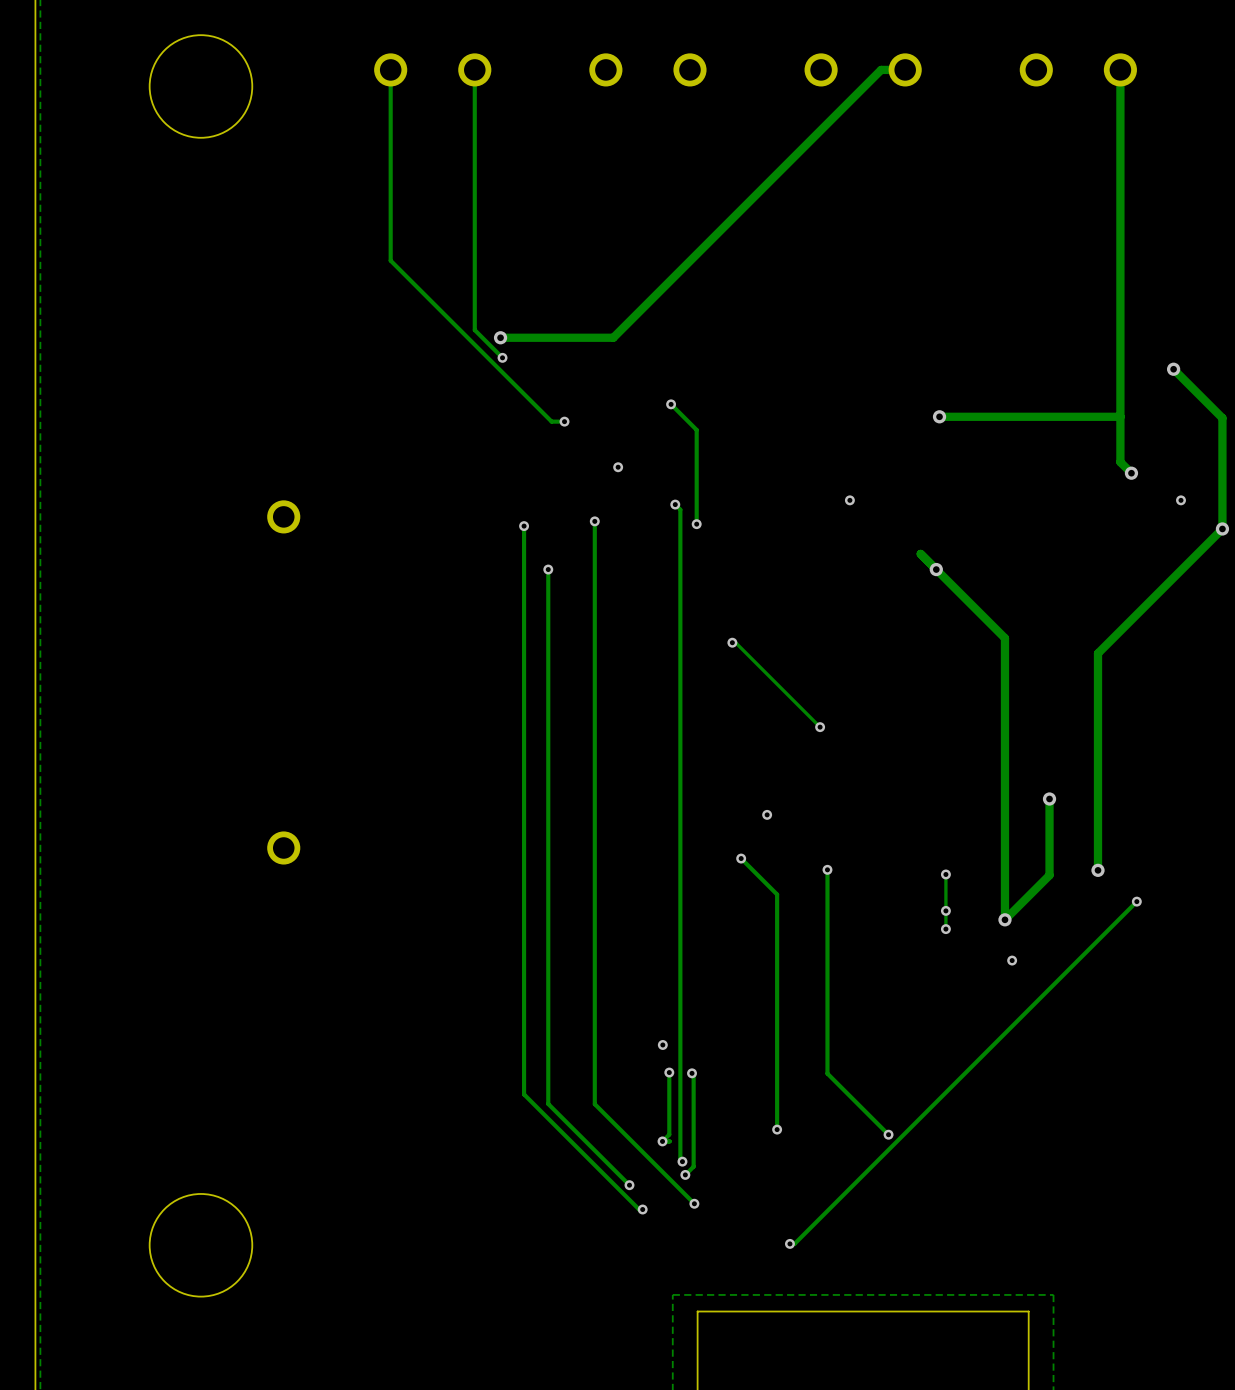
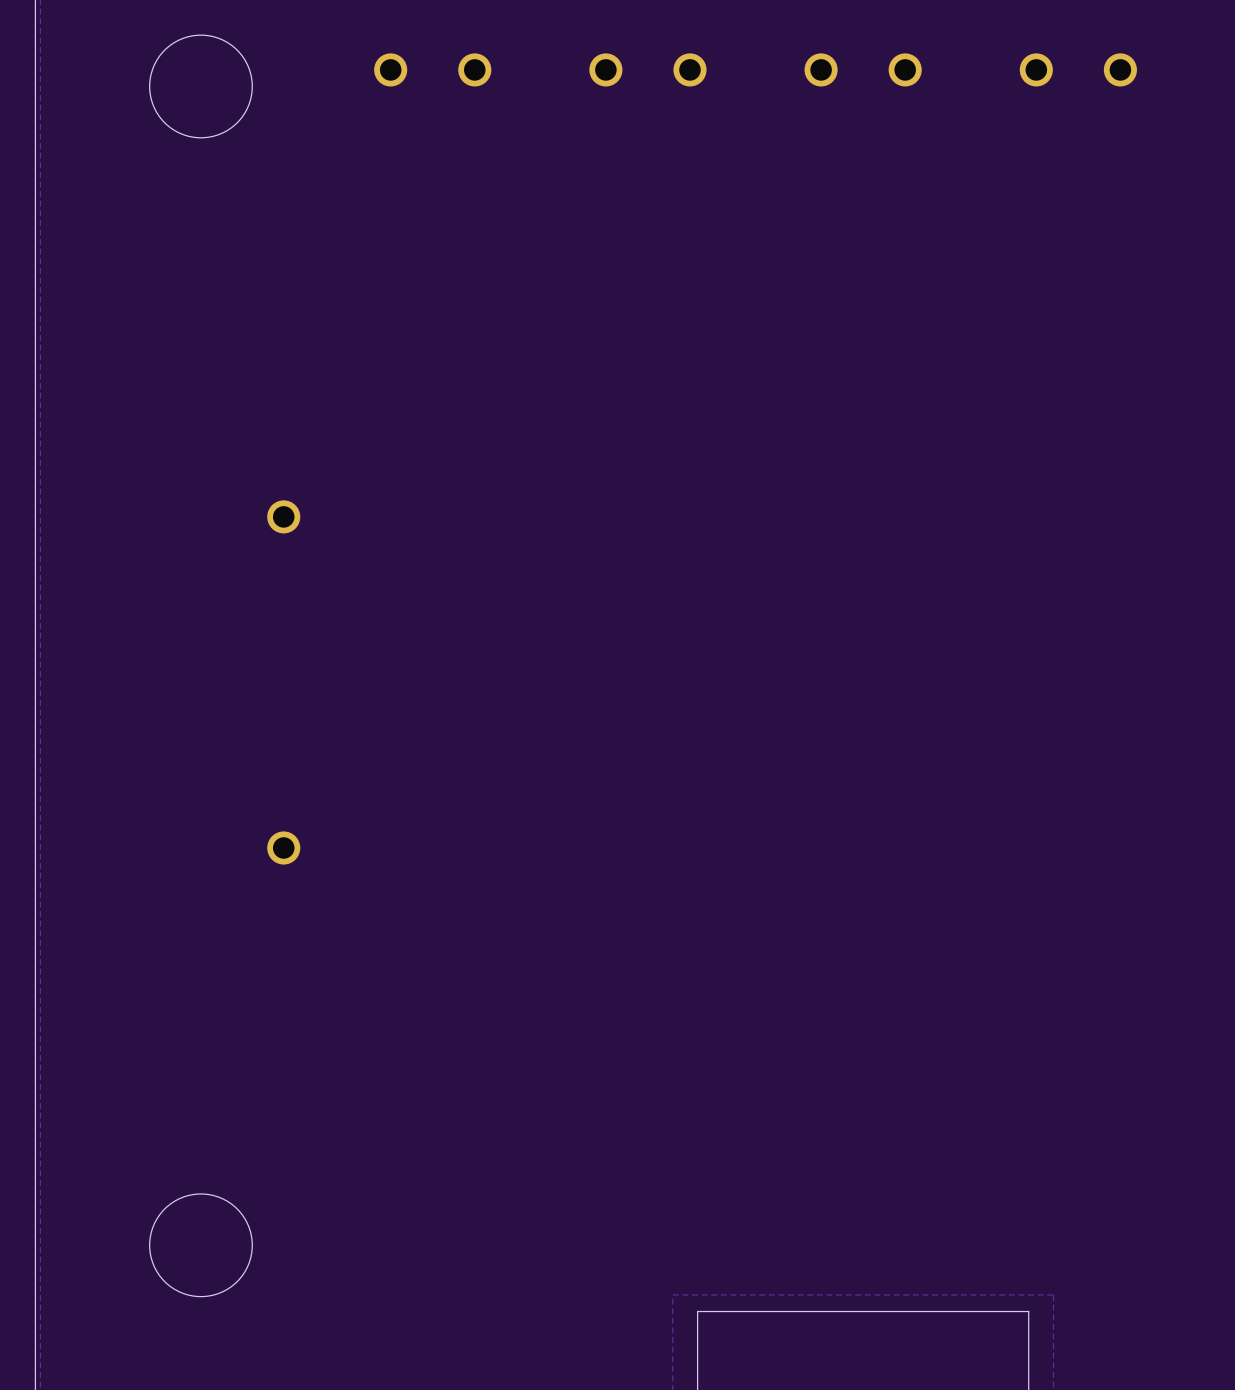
track: (390, 69) (390, 260) (551, 421) (564, 421) -> none
track: (474, 69) (474, 330) (502, 357) -> none
track: (905, 69) (881, 69) (613, 337) (500, 337) -> none
track: (1120, 69) (1120, 462) (1131, 473) -> none
via: (500, 337) -> none
via: (502, 357) -> none
track: (1173, 369) (1222, 418) (1222, 528) (1098, 653) (1098, 870) -> none
via: (1173, 369) -> none
track: (671, 404) (696, 429) (696, 524) -> none
via: (671, 404) -> none
via: (939, 416) -> none
track: (1120, 416) (939, 416) -> none
via: (564, 421) -> none
via: (618, 467) -> none
via: (1131, 473) -> none
via: (849, 500) -> none
via: (1180, 500) -> none
track: (675, 504) (680, 509) (680, 1159) (683, 1161) -> none
via: (675, 504) -> none
track: (594, 521) (594, 1104) (694, 1203) -> none
via: (594, 521) -> none
via: (696, 524) -> none
track: (524, 526) (524, 1094) (639, 1209) (642, 1209) -> none
via: (524, 526) -> none
via: (1222, 528) -> none
track: (920, 553) (1004, 638) (1004, 919) (1049, 875) (1049, 798) -> none
track: (548, 569) (548, 1103) (629, 1185) -> none
via: (548, 569) -> none
via: (936, 569) -> none
track: (732, 642) (735, 642) (820, 727) -> none
via: (732, 642) -> none
via: (820, 727) -> none
via: (1049, 798) -> none
via: (767, 814) -> none
track: (741, 858) (777, 894) (777, 1129) -> none
via: (741, 858) -> none
track: (827, 869) (827, 1073) (888, 1134) -> none
via: (827, 869) -> none
via: (1098, 870) -> none
track: (945, 874) (945, 929) -> none
via: (945, 874) -> none
track: (1136, 901) (794, 1243) (789, 1243) -> none
via: (1136, 901) -> none
via: (945, 910) -> none
via: (1004, 919) -> none
via: (945, 929) -> none
via: (1012, 960) -> none
via: (662, 1044) -> none
track: (669, 1072) (669, 1134) (662, 1141) (669, 1141) -> none
via: (669, 1072) -> none
track: (692, 1073) (693, 1074) (693, 1166) (685, 1174) -> none
via: (692, 1073) -> none
via: (777, 1129) -> none
via: (888, 1134) -> none
via: (662, 1141) -> none
via: (682, 1161) -> none
via: (685, 1174) -> none
via: (629, 1185) -> none
via: (694, 1203) -> none
via: (642, 1209) -> none
via: (789, 1243) -> none

